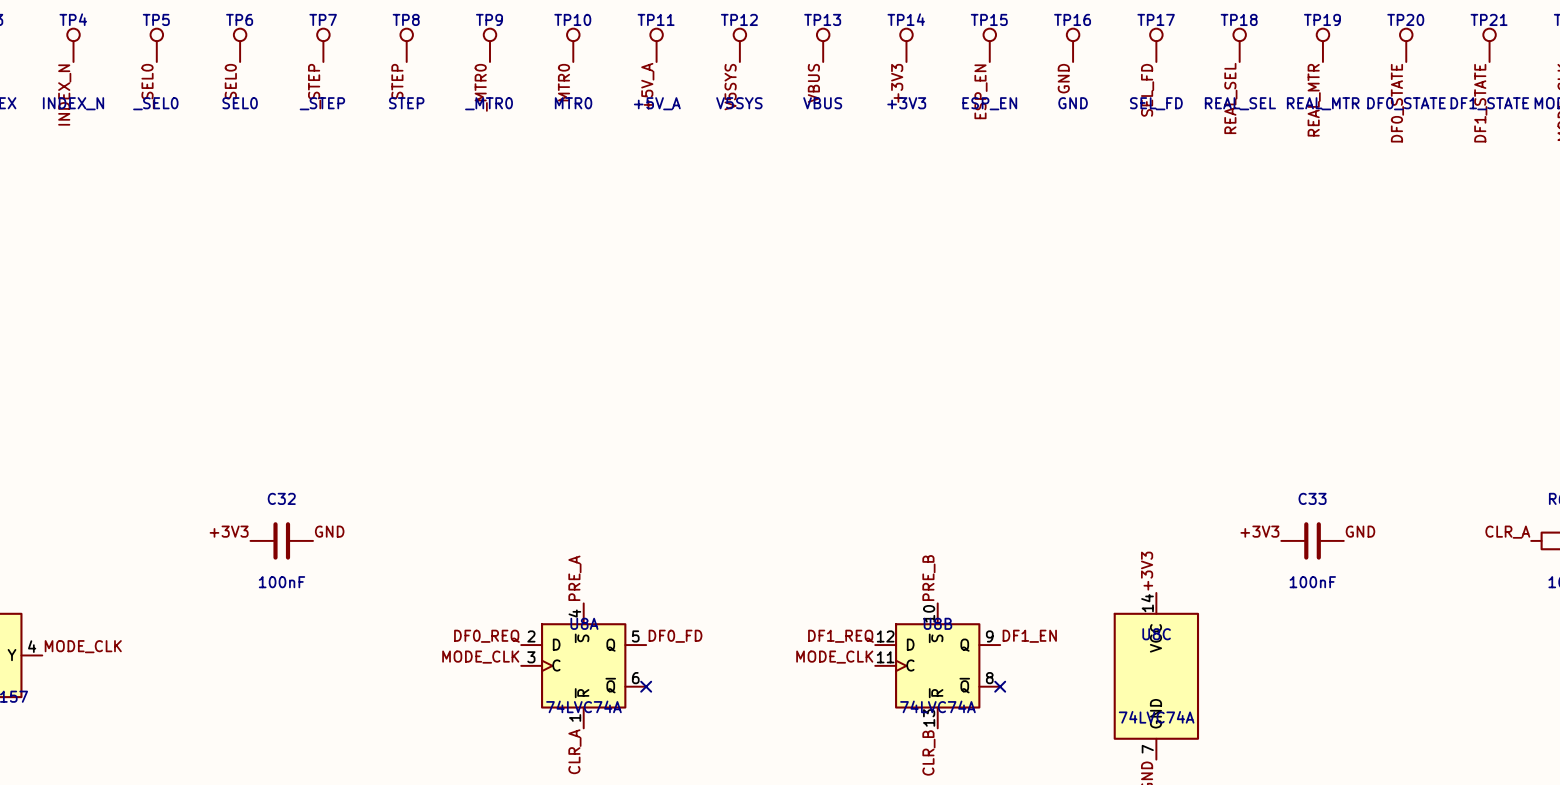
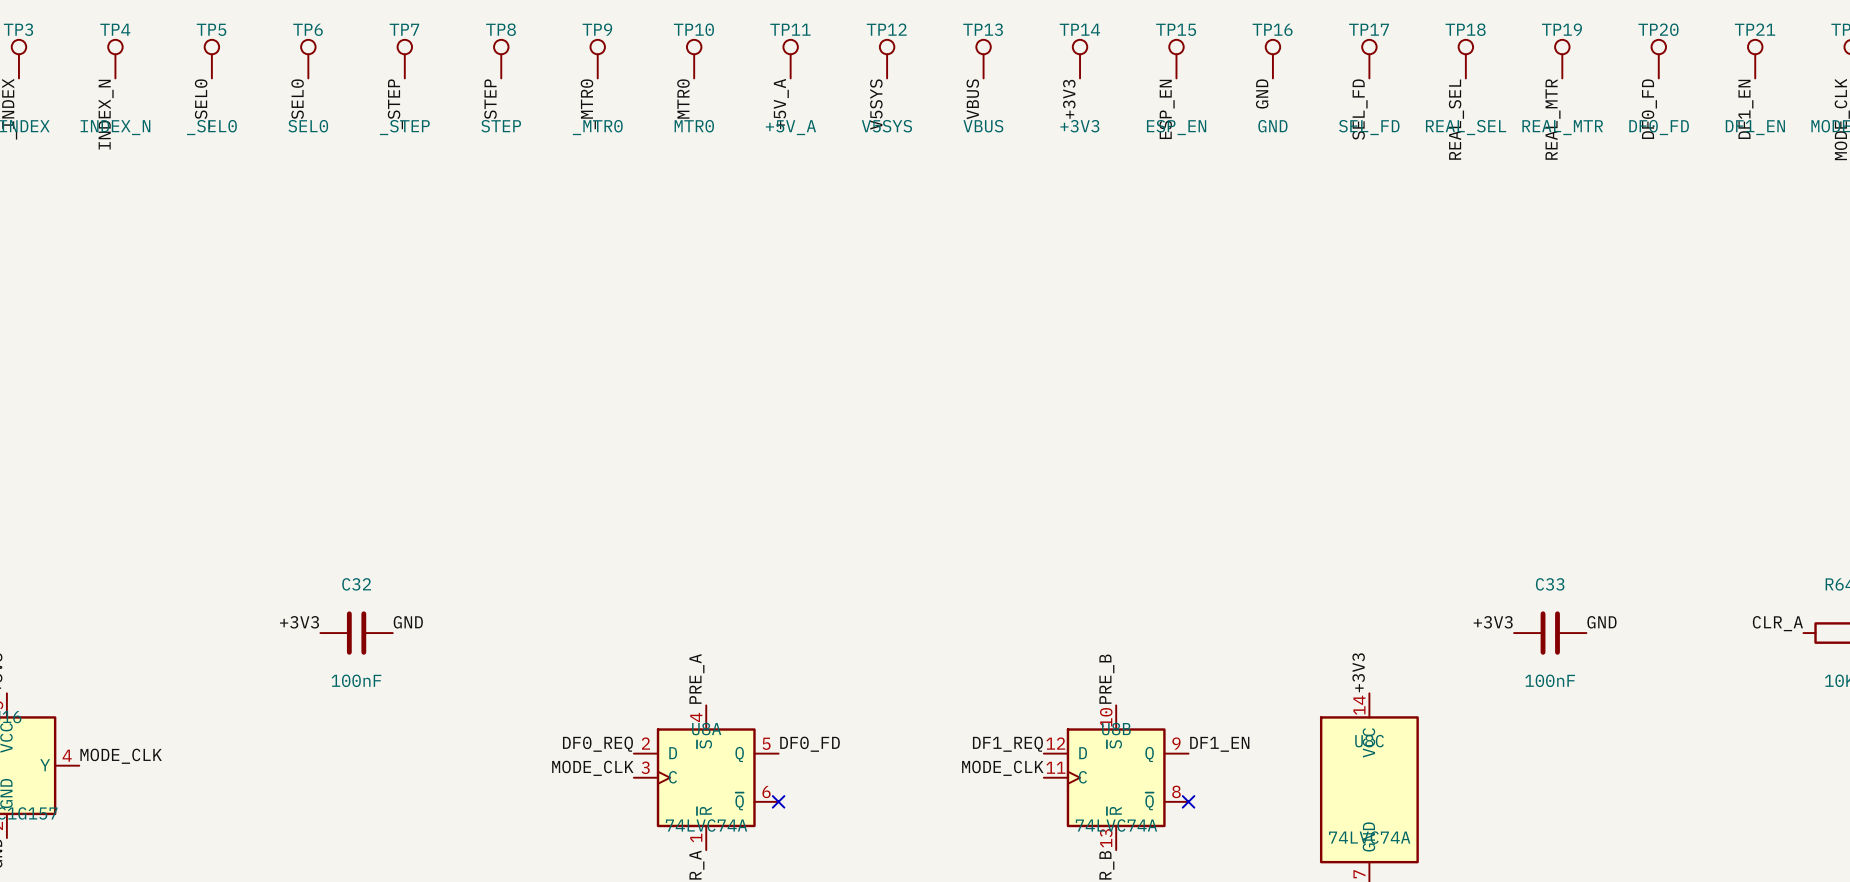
label: DF0_STATE (1397, 103) -> DF0_FD (1649, 109)
TP20 value: DF0_STATE (1406, 103) -> DF0_FD (1659, 127)
label: DF1_STATE (1480, 103) -> DF1_EN (1745, 109)
TP21 value: DF1_STATE (1489, 103) -> DF1_EN (1755, 127)

